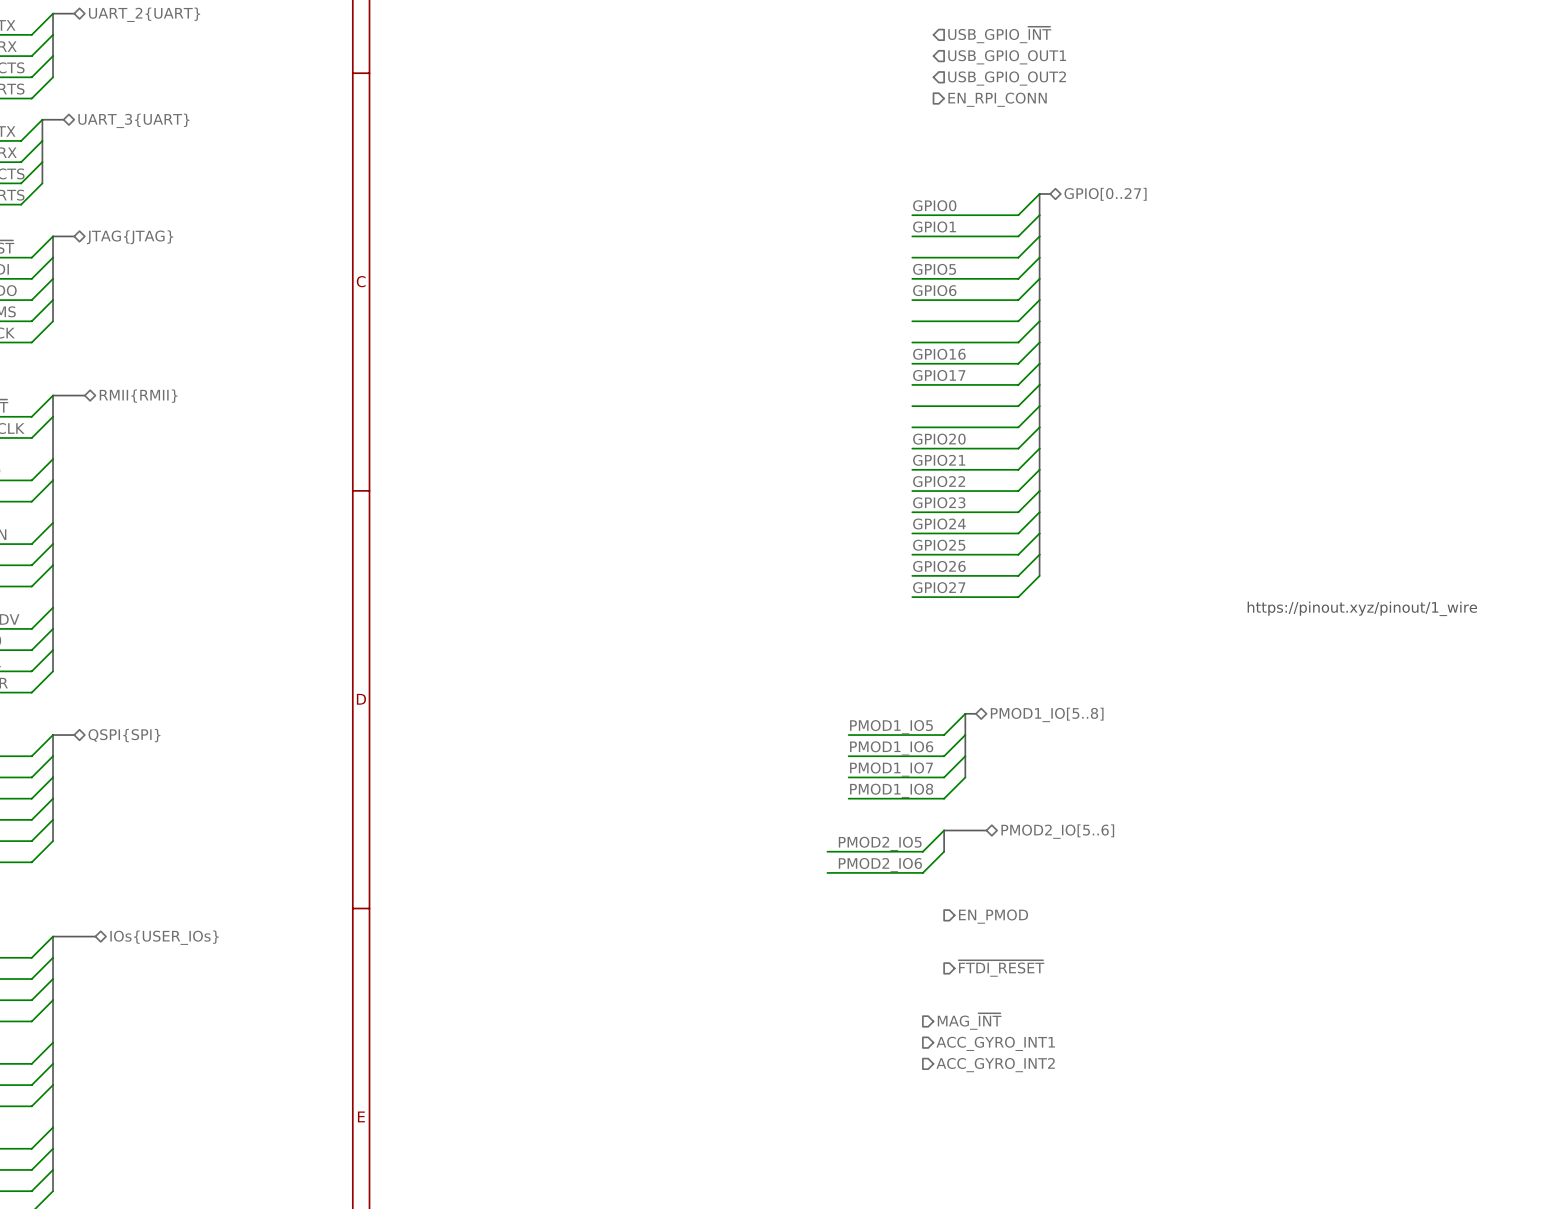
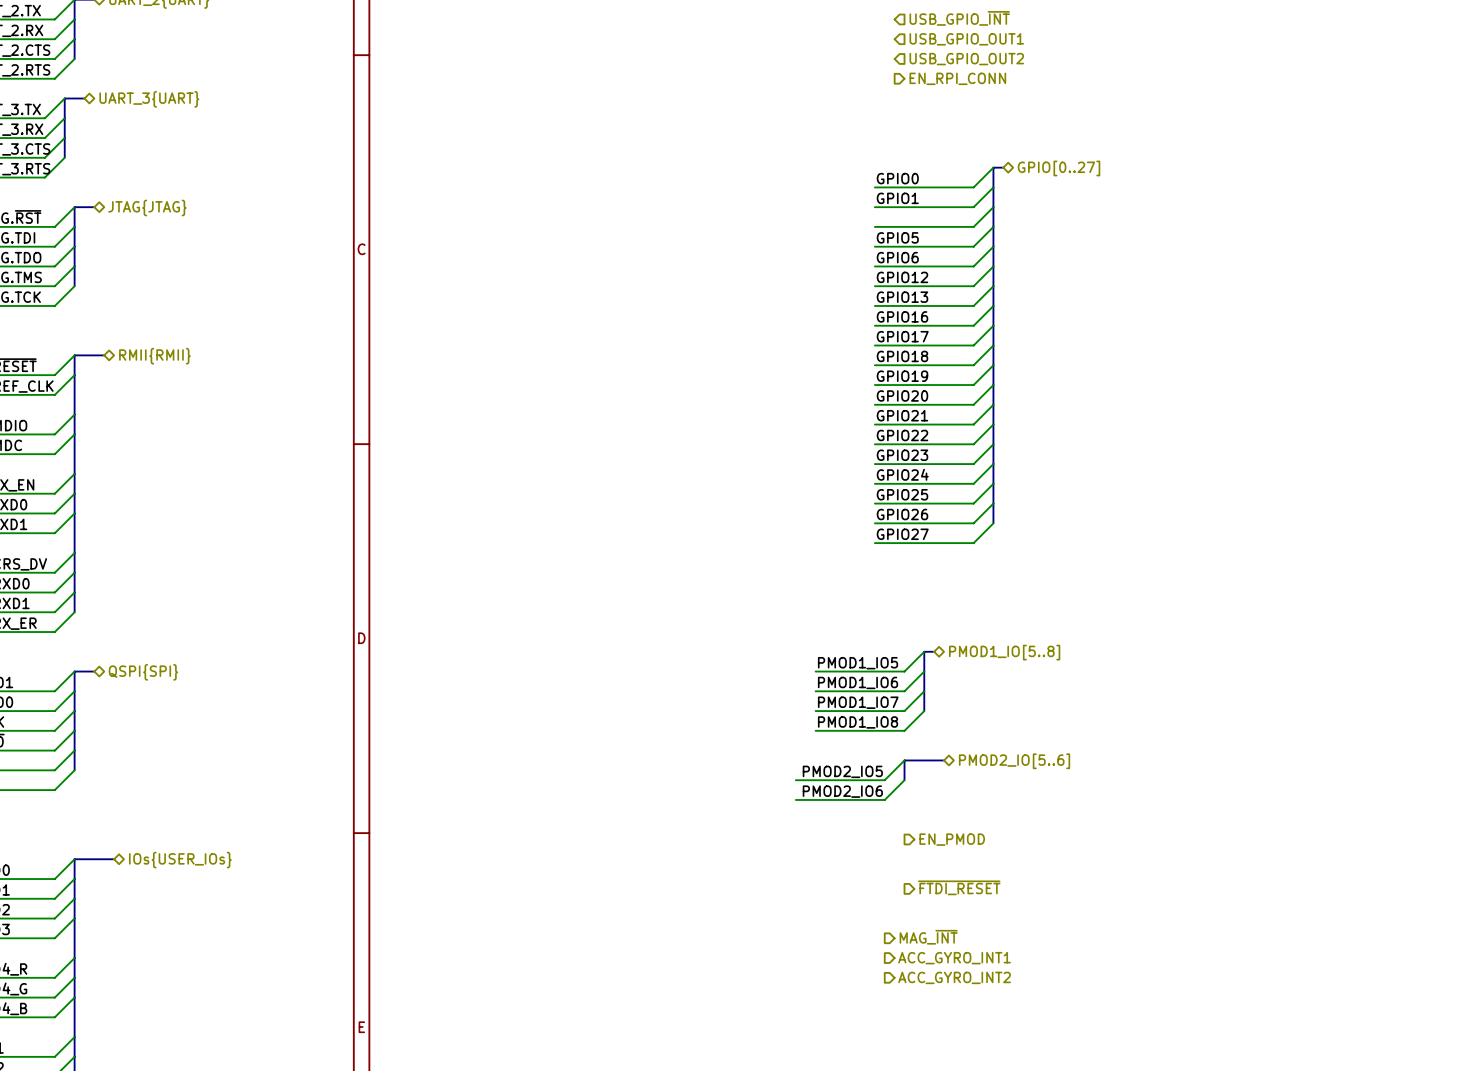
label: none -> GPIO12 (902, 277)
label: none -> GPIO13 (902, 297)
label: none -> GPIO18 (902, 356)
label: none -> GPIO19 (902, 376)
text: https://pinout.xyz/pinout/1_wire (1362, 608) -> none

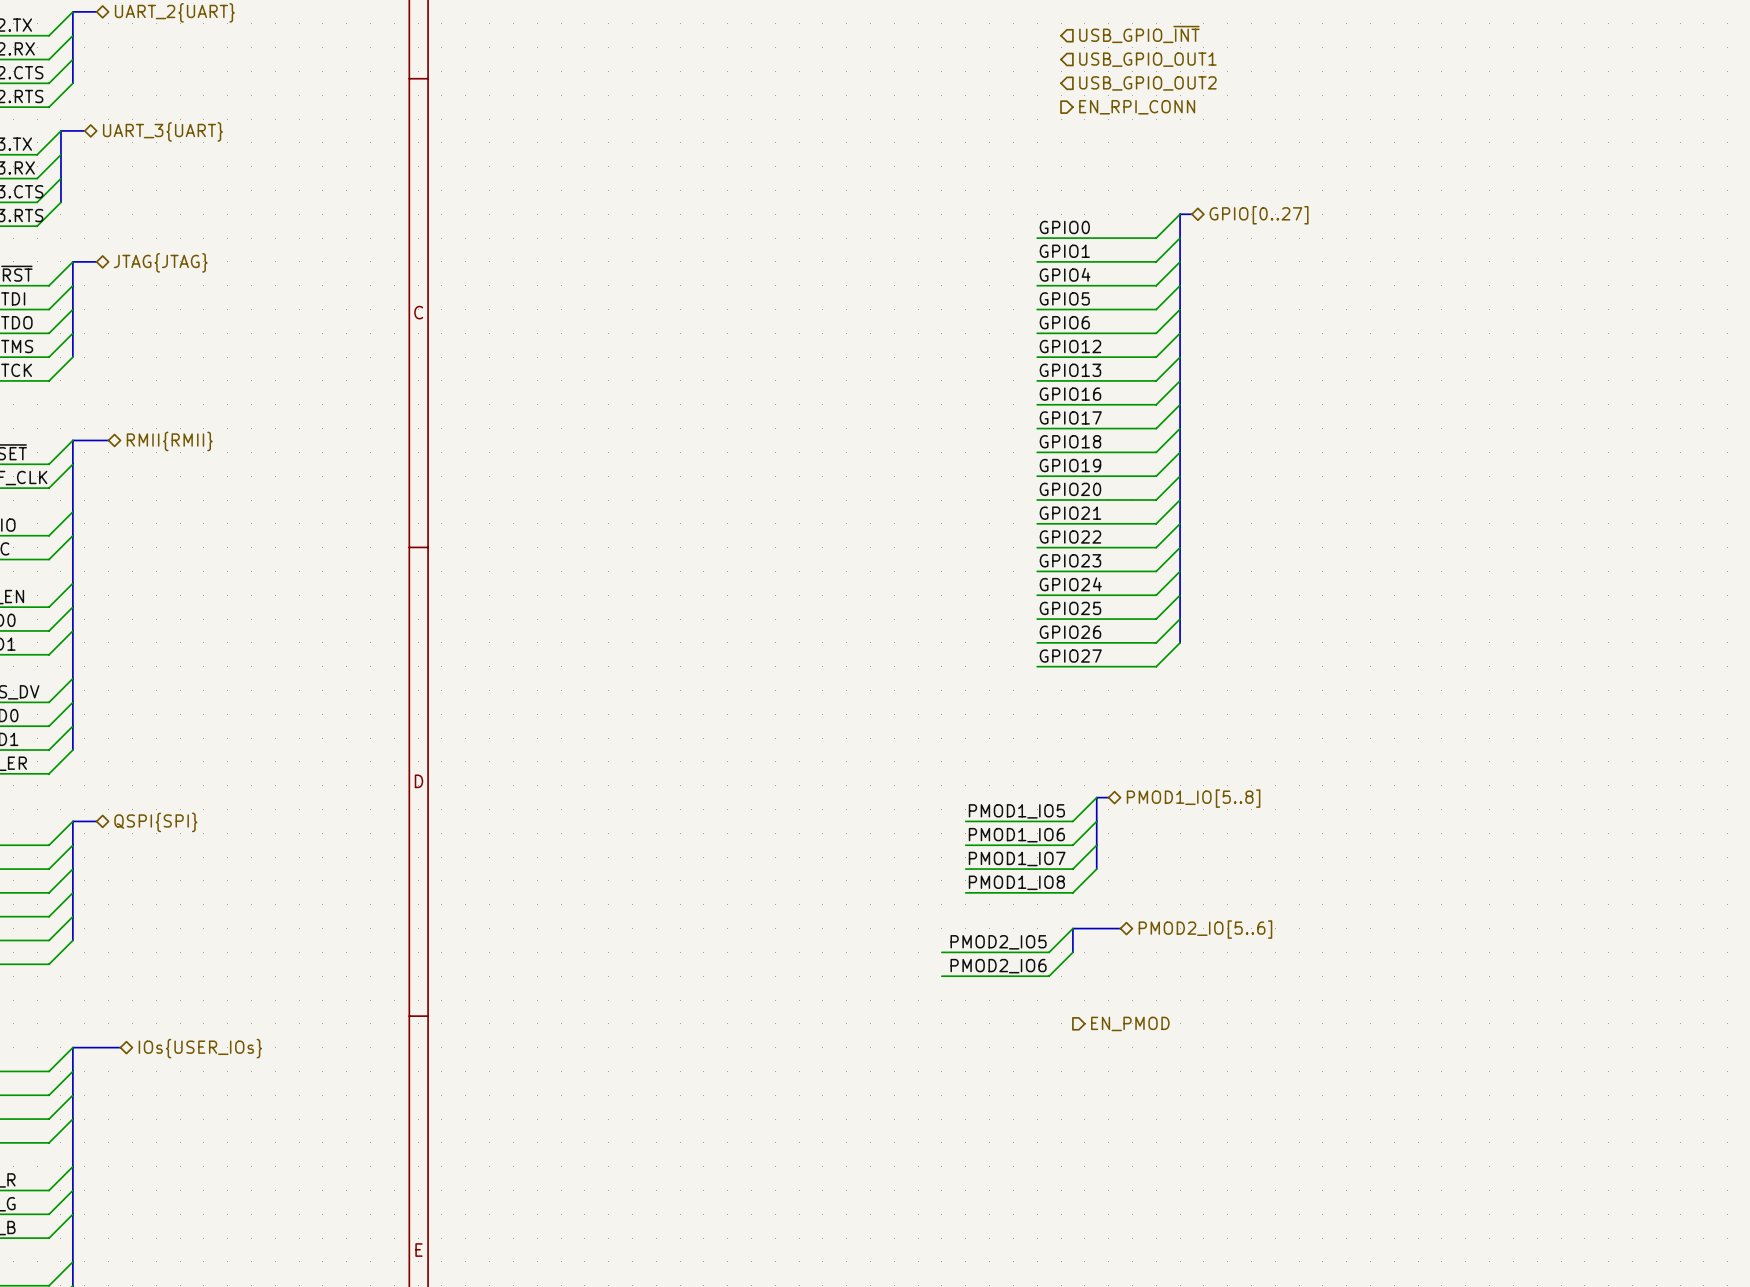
label: none -> GPIO4 (1065, 274)
hierarchical label: ~{FTDI_RESET} (959, 887) -> none
hierarchical label: MAG_~{INT} (928, 937) -> none
hierarchical label: ACC_GYRO_INT1 (954, 958) -> none
hierarchical label: ACC_GYRO_INT2 (954, 977) -> none

